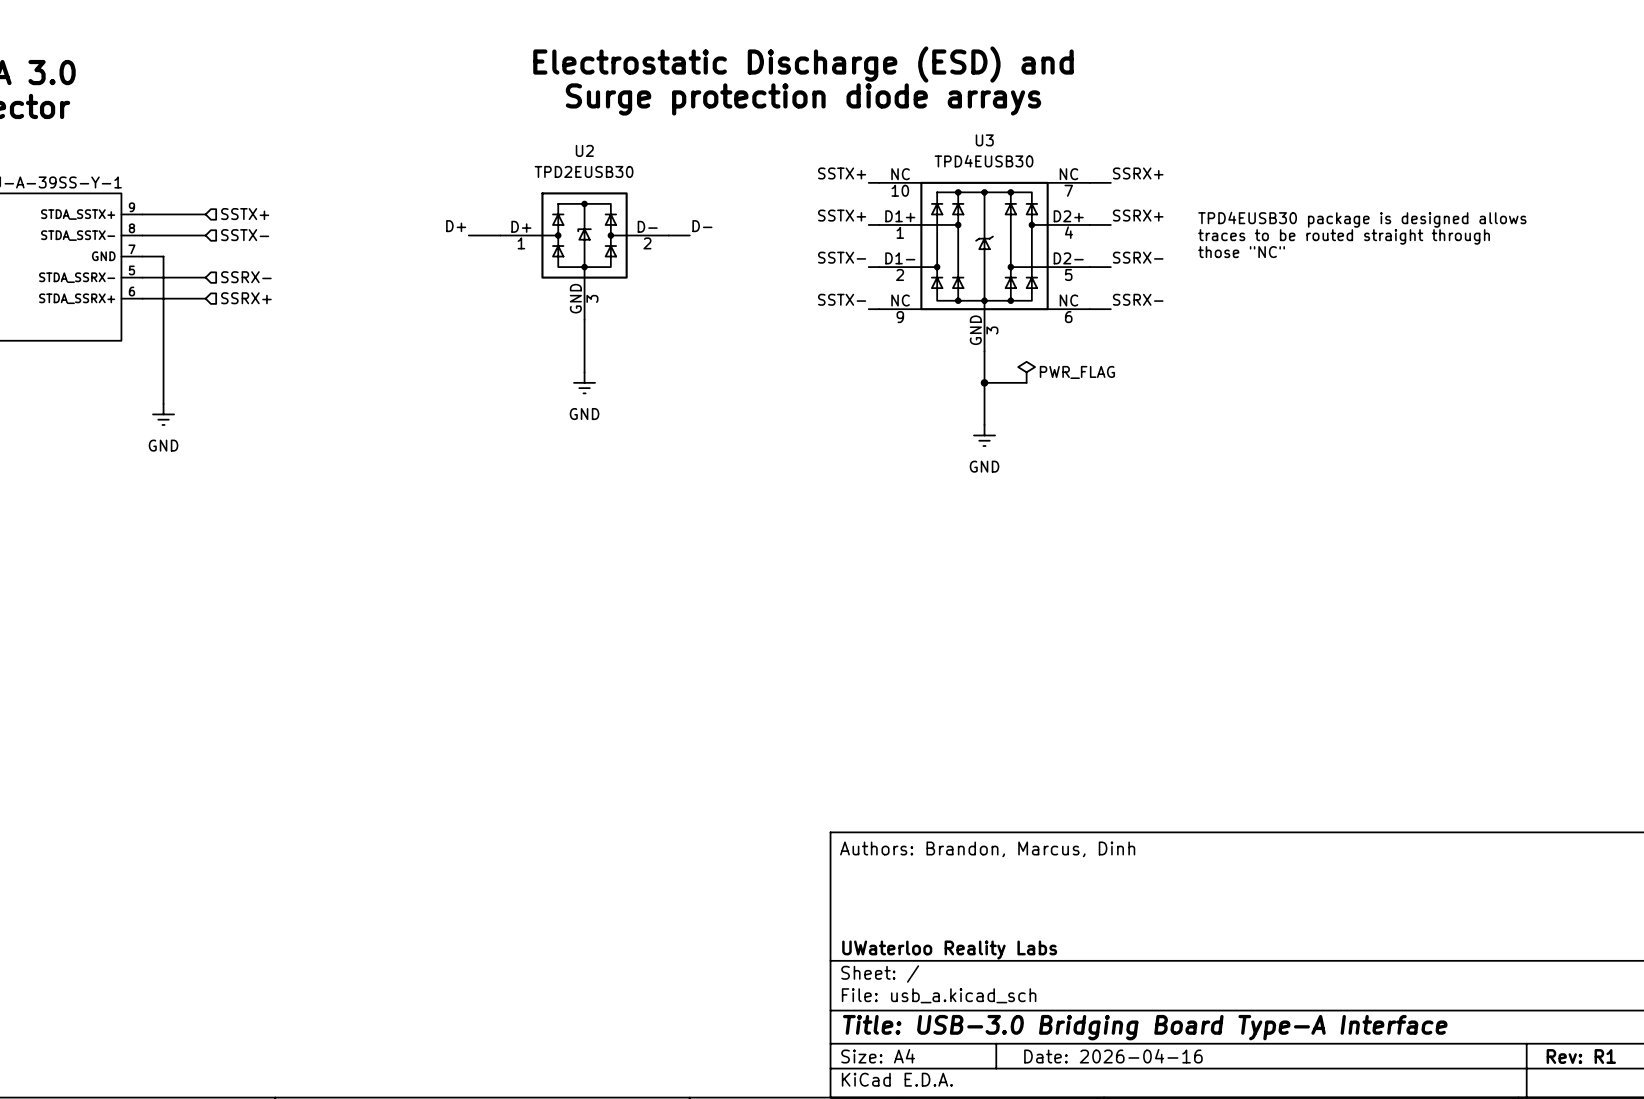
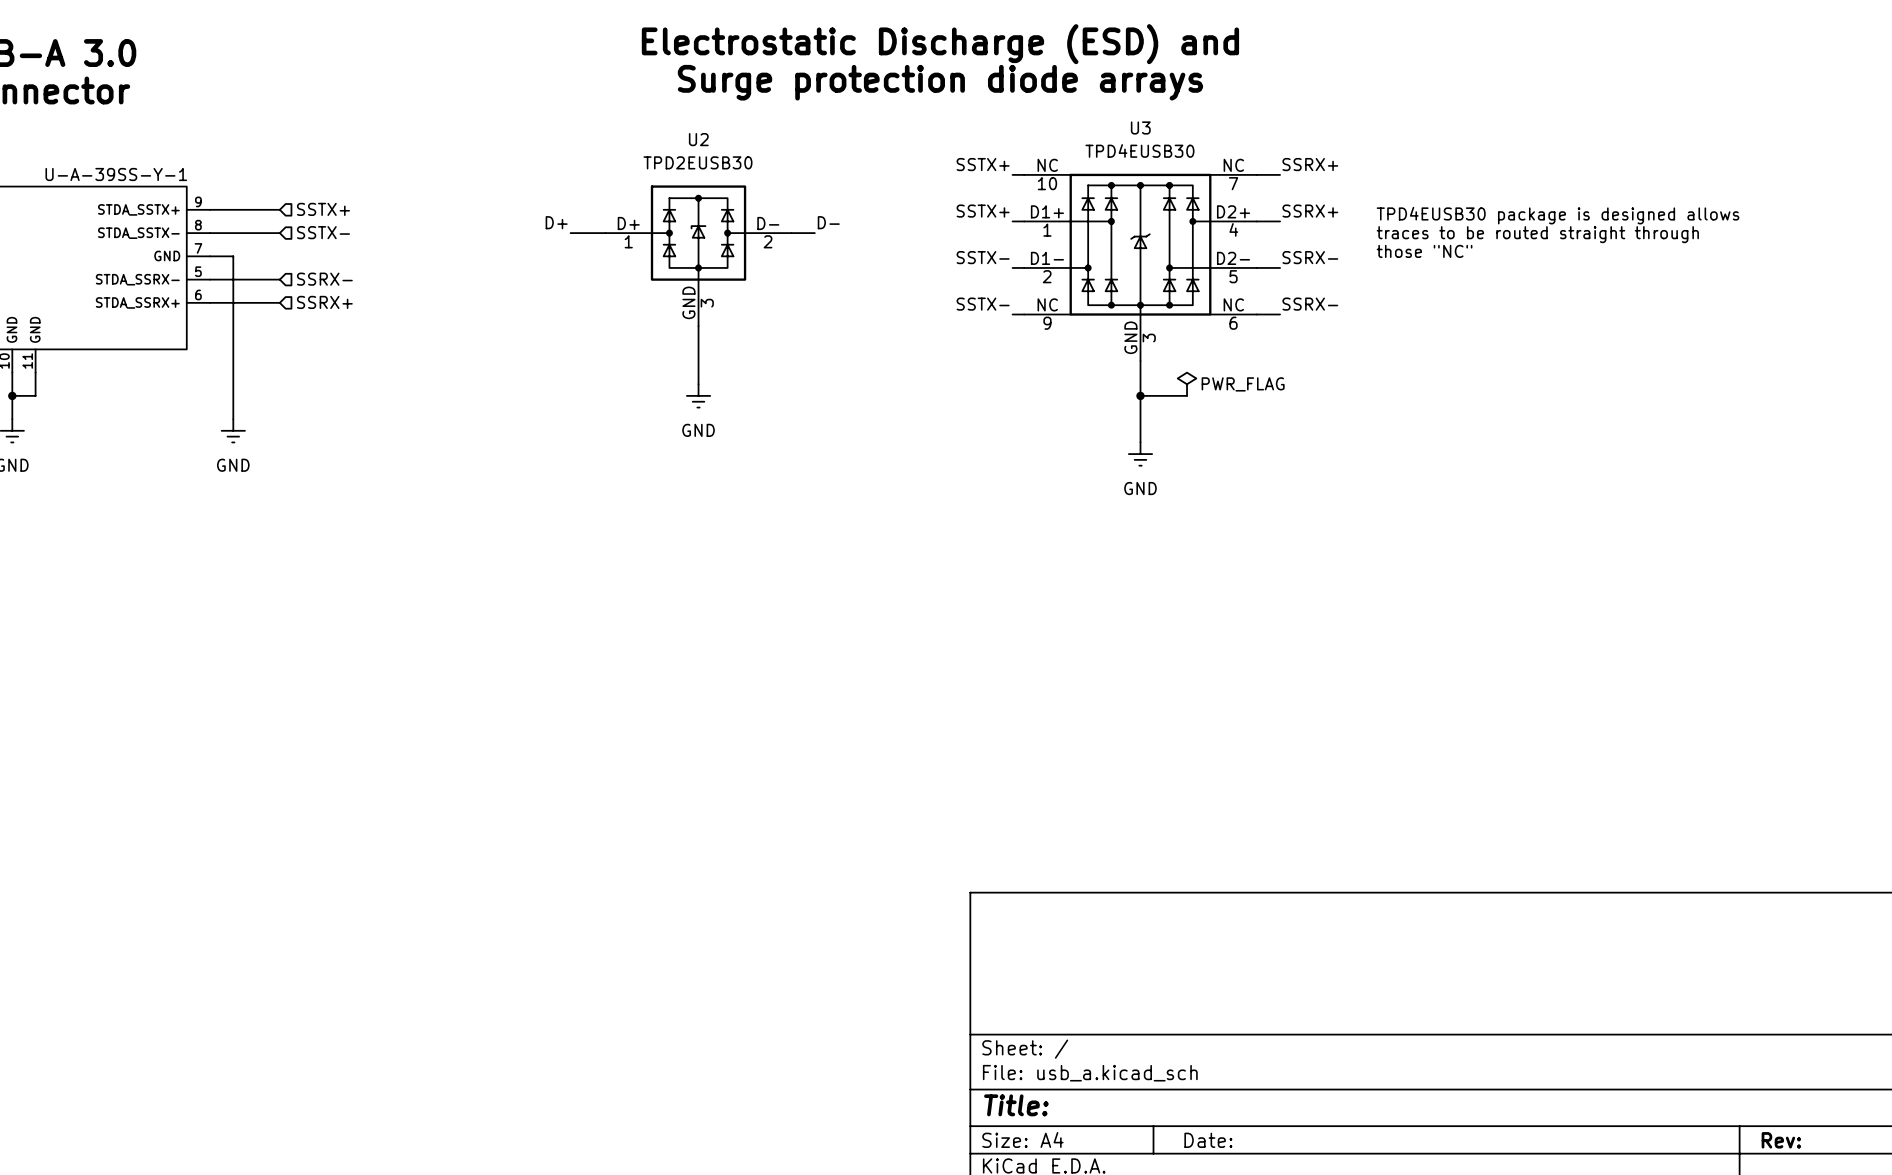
title block: Authors: Brandon, Marcus, Dinh (987, 849) -> none
title block: UWaterloo Reality Labs (949, 950) -> none
title block: Title: USB-3.0 Bridging Board Type-A Interface (1145, 1027) -> Title: (1016, 1105)
title block: Date: 2026-04-16 (1113, 1056) -> Date: (1208, 1140)
title block: Rev: R1 (1581, 1056) -> Rev: (1781, 1140)

